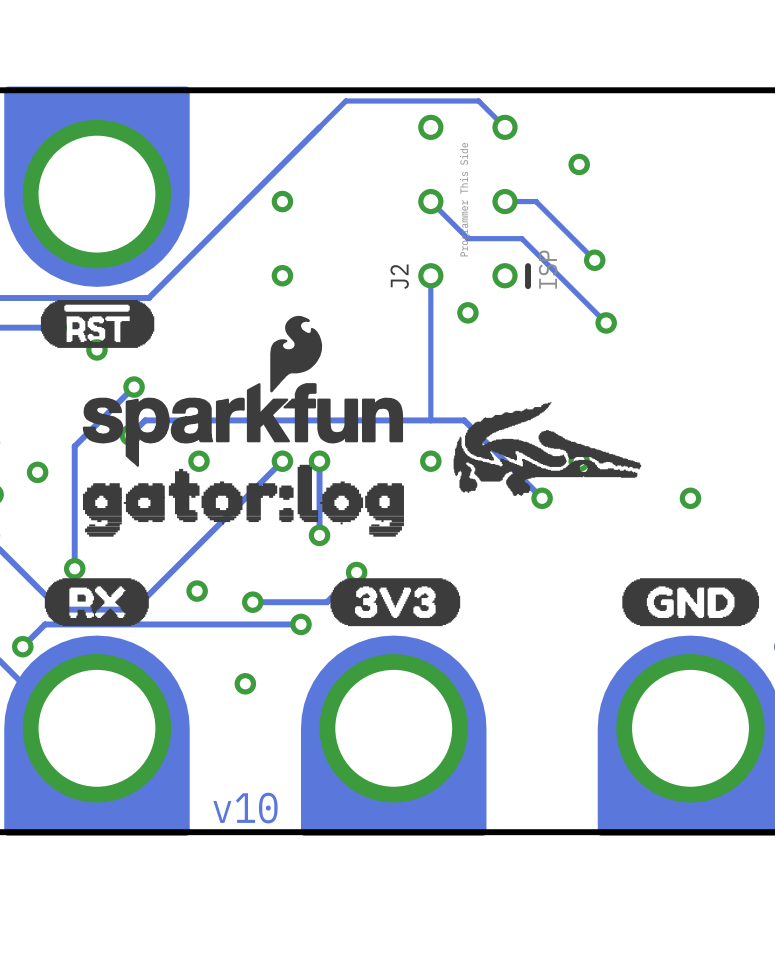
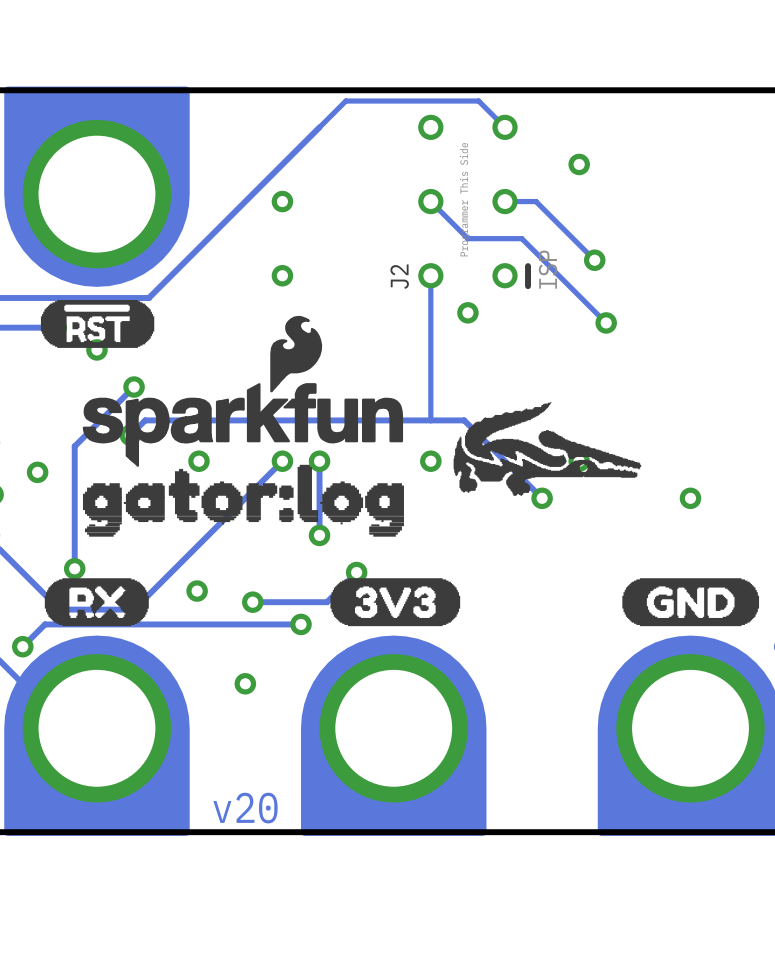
text: v10 (245, 808) -> v20 (245, 808)

